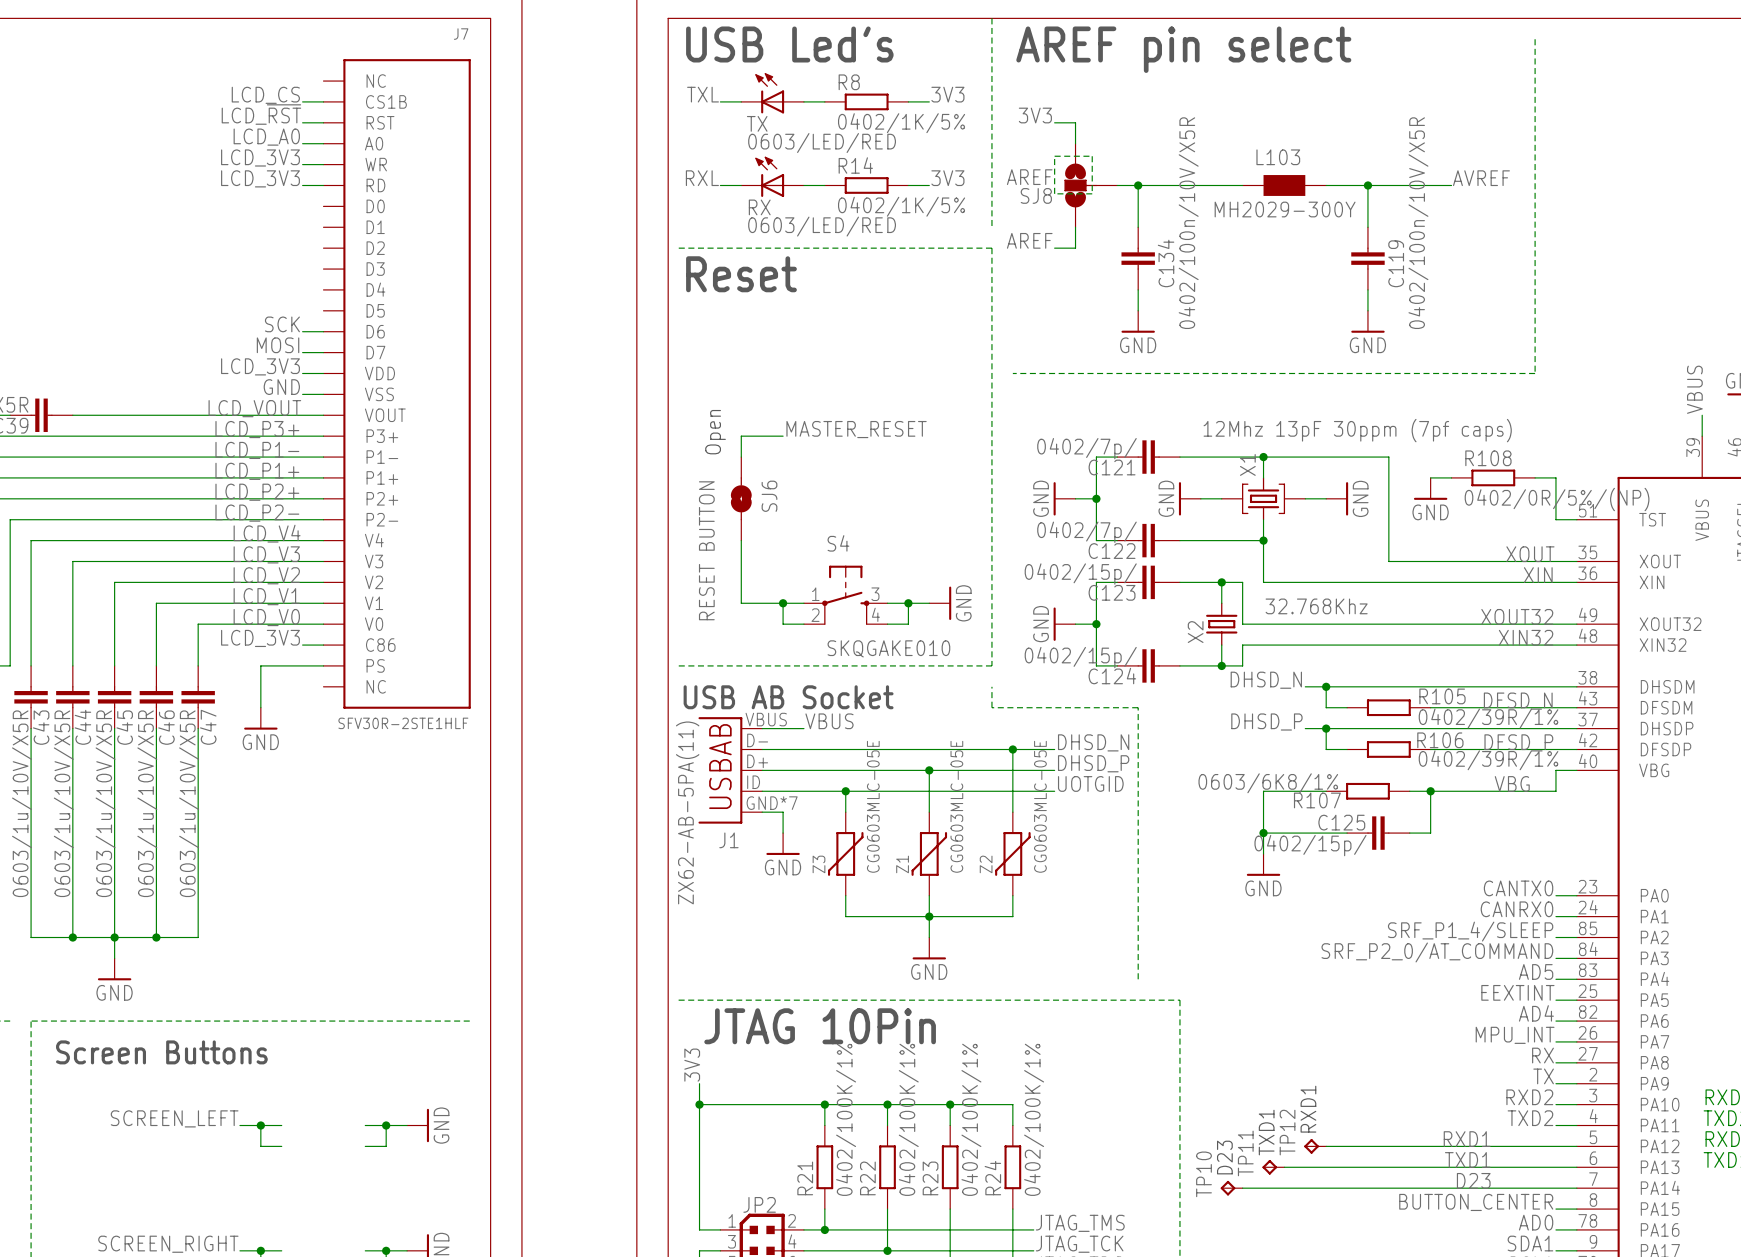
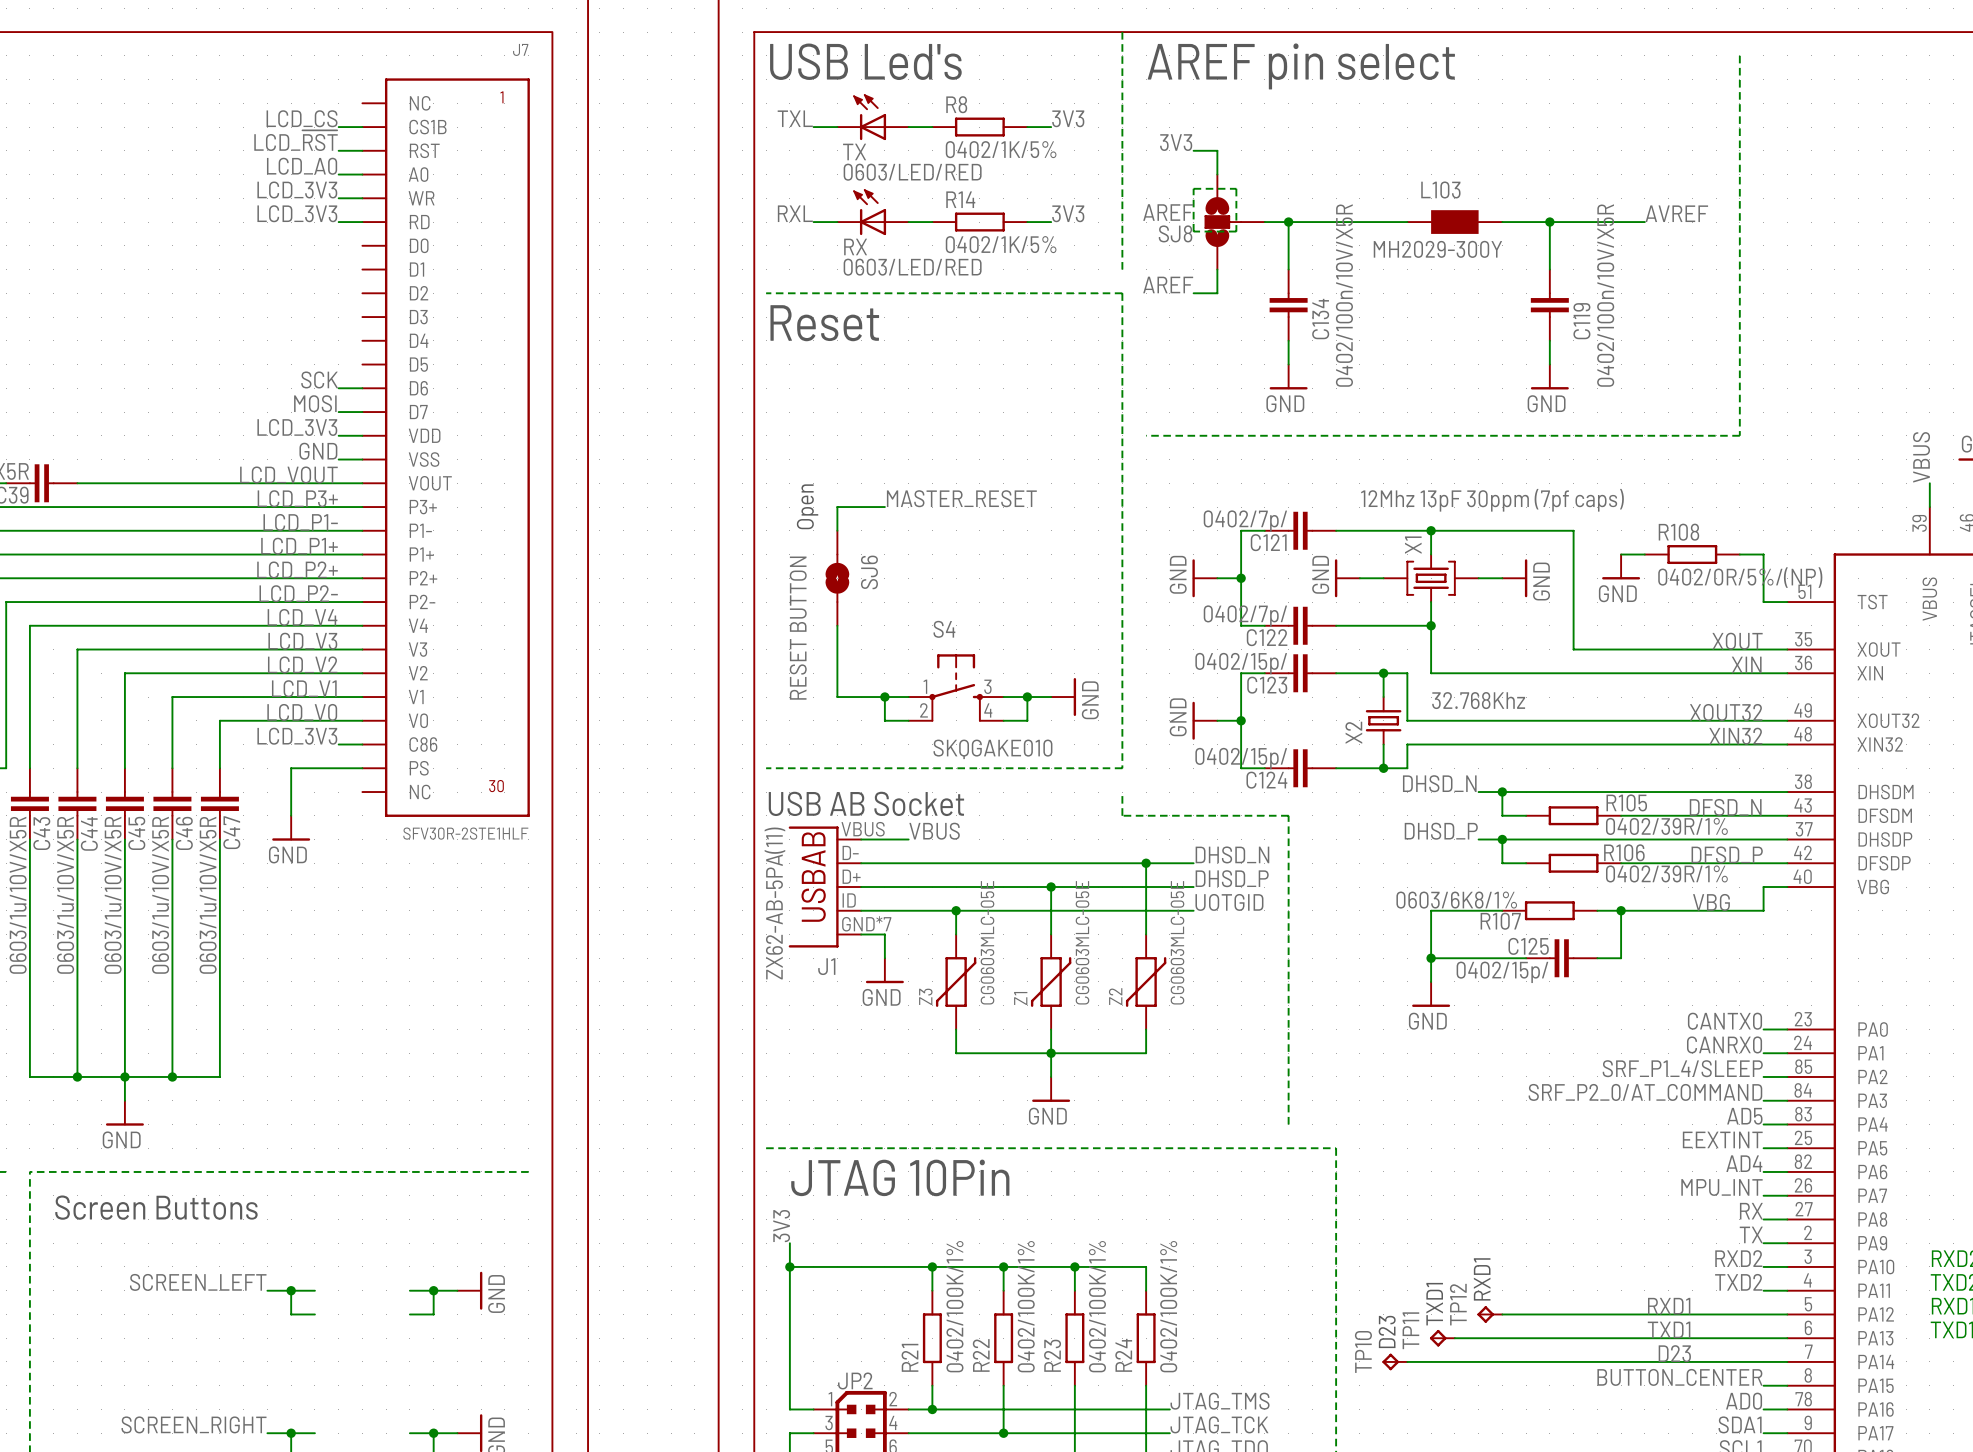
J7 text: none -> 1 (501, 97)
J7 text: none -> 30 (496, 786)

